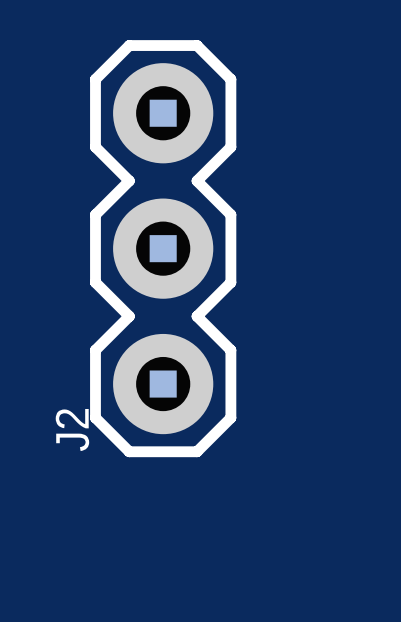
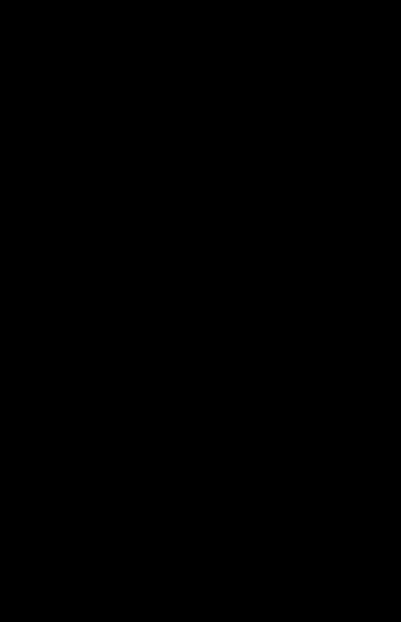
J2: (163, 248) -> none

